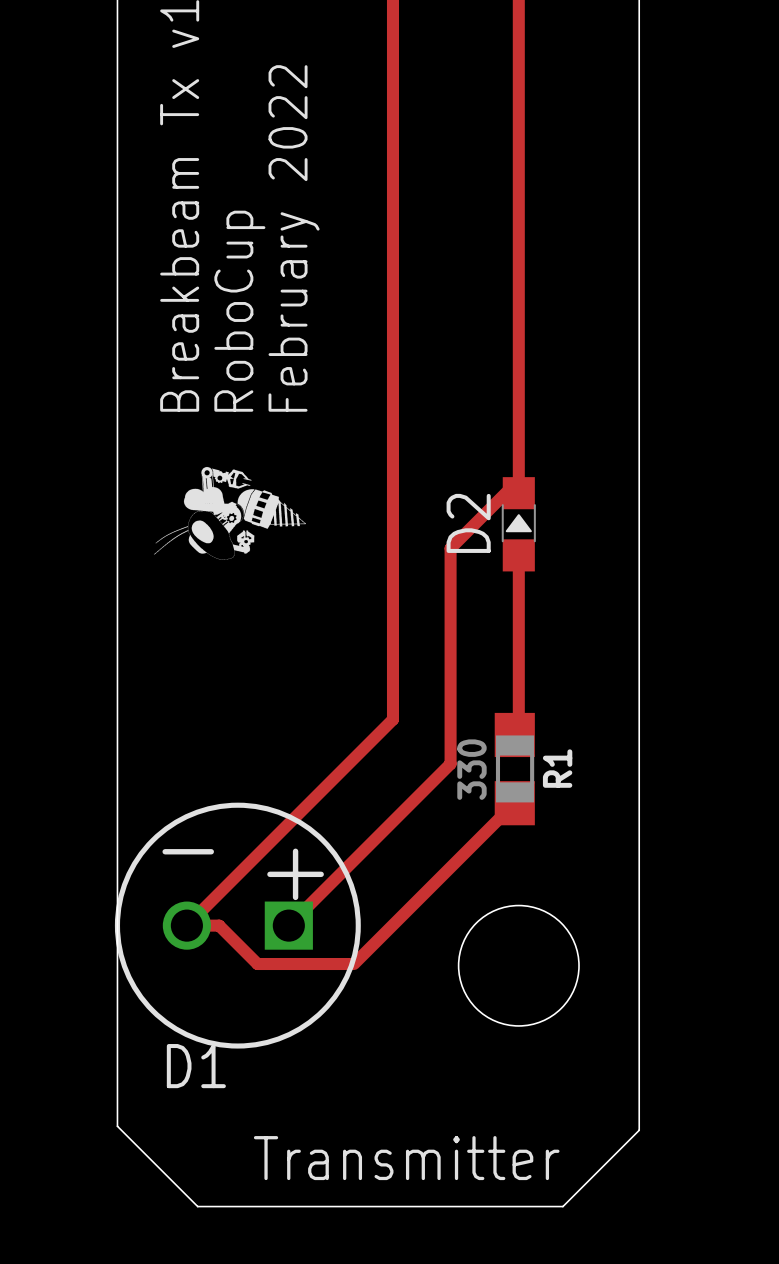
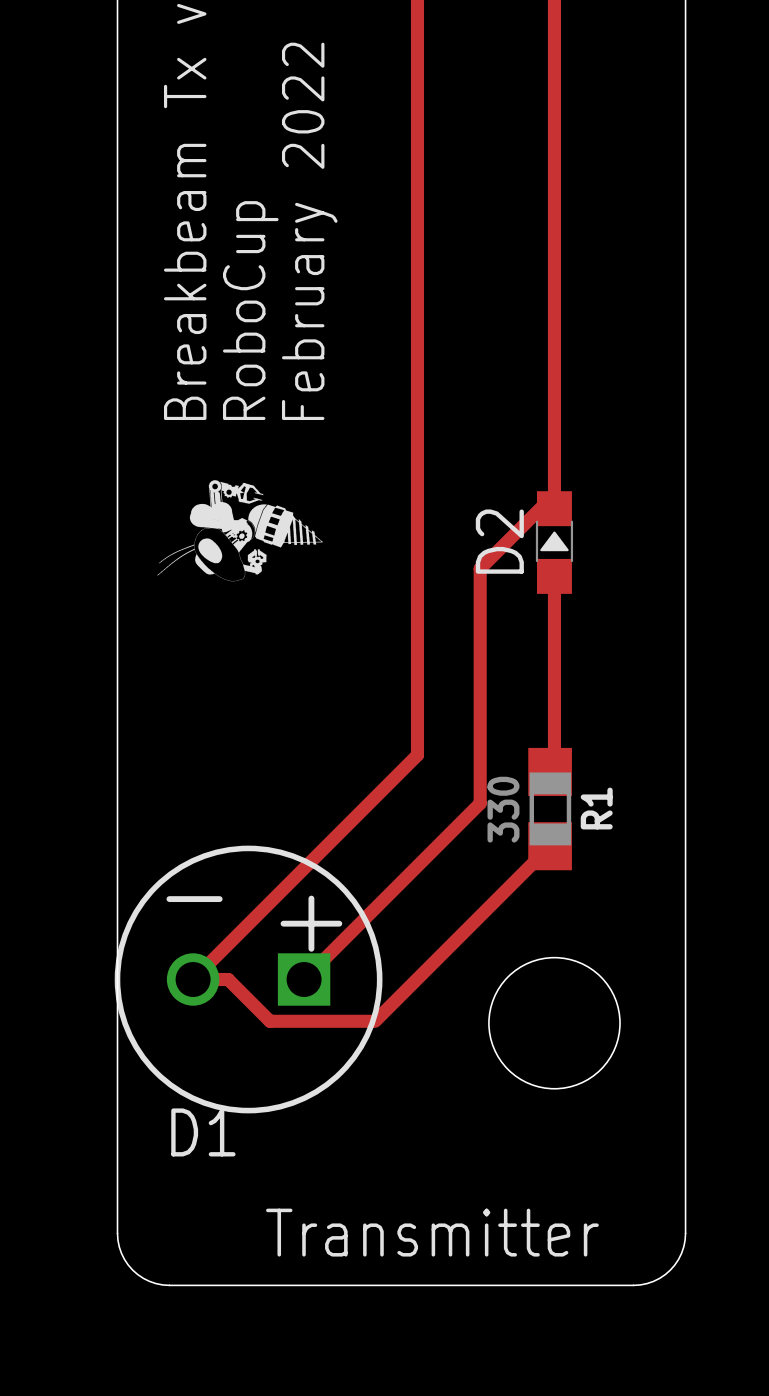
board edge: (117, 1126) (197, 1206) -> (117, 1197) (119, 1246) (124, 1259) (132, 1270) (143, 1278) (156, 1283) (204, 1285)
board edge: (639, 1130) (562, 1206) -> (685, 1202) (683, 1246) (678, 1259) (670, 1270) (659, 1278) (647, 1283) (602, 1285)

